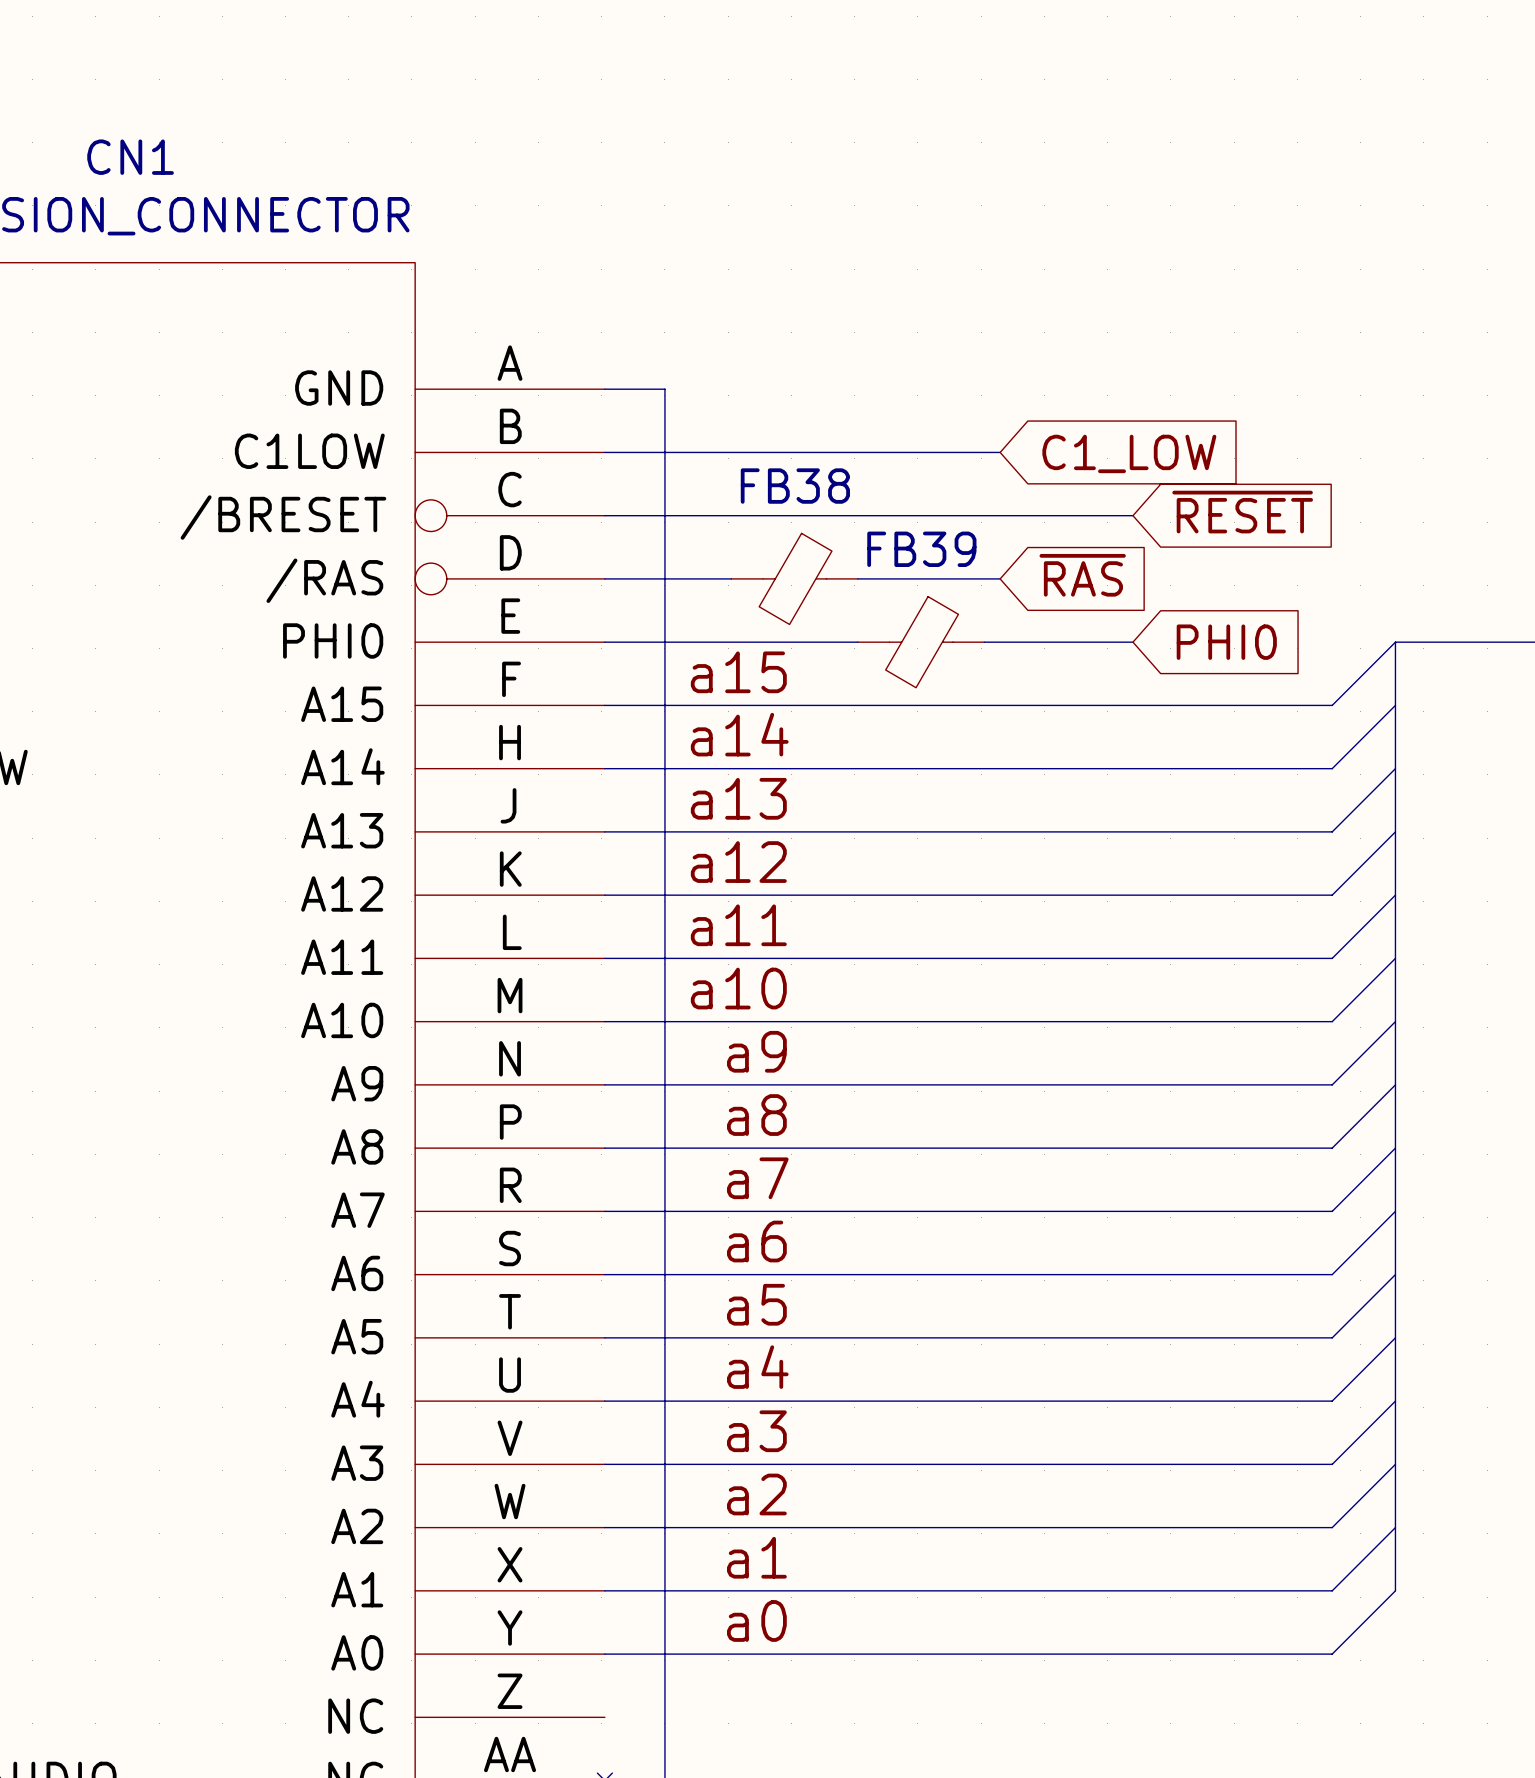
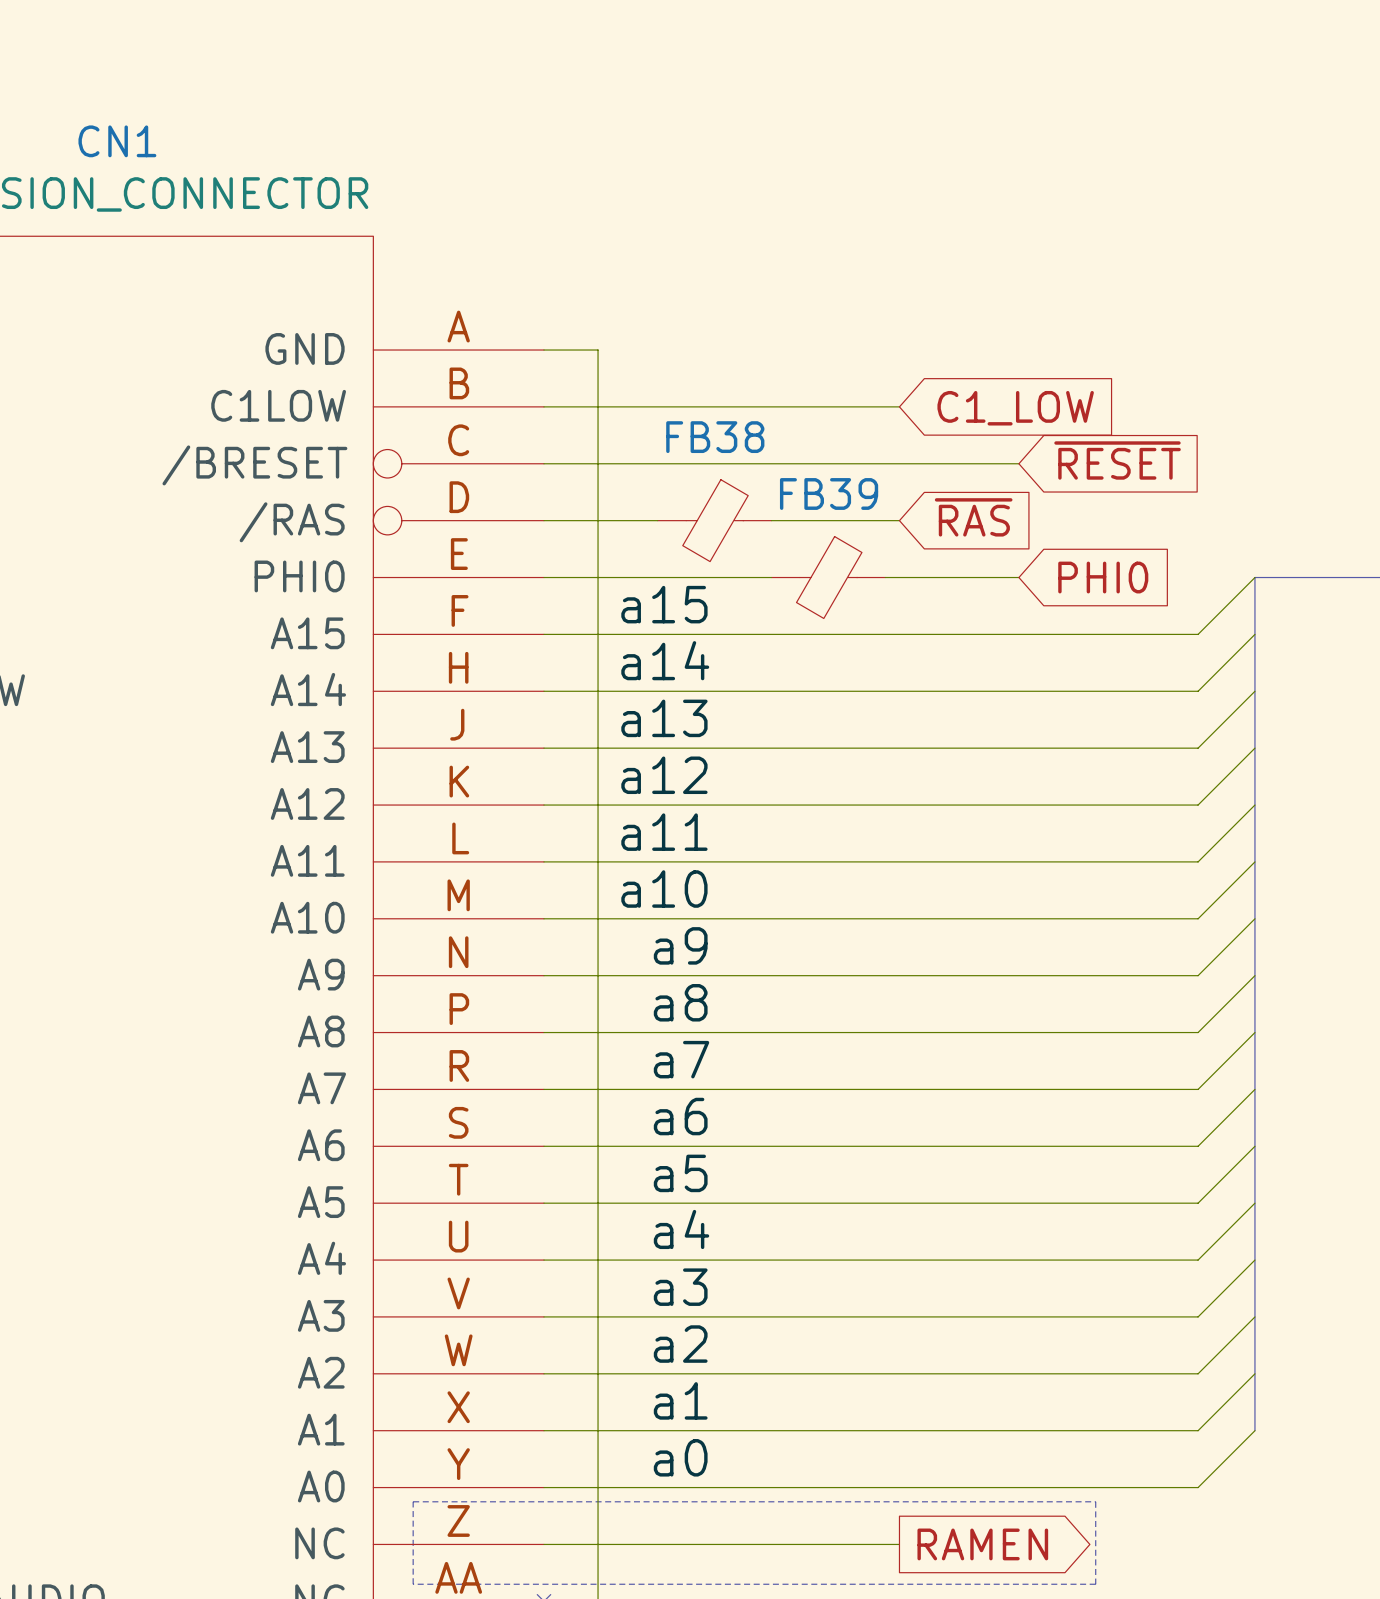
line: none -> (413, 1501) (1095, 1501) (1095, 1584) (413, 1584) (413, 1501)
wire: none -> (543, 1544) (899, 1544)
global label: none -> RAMEN (982, 1544)

